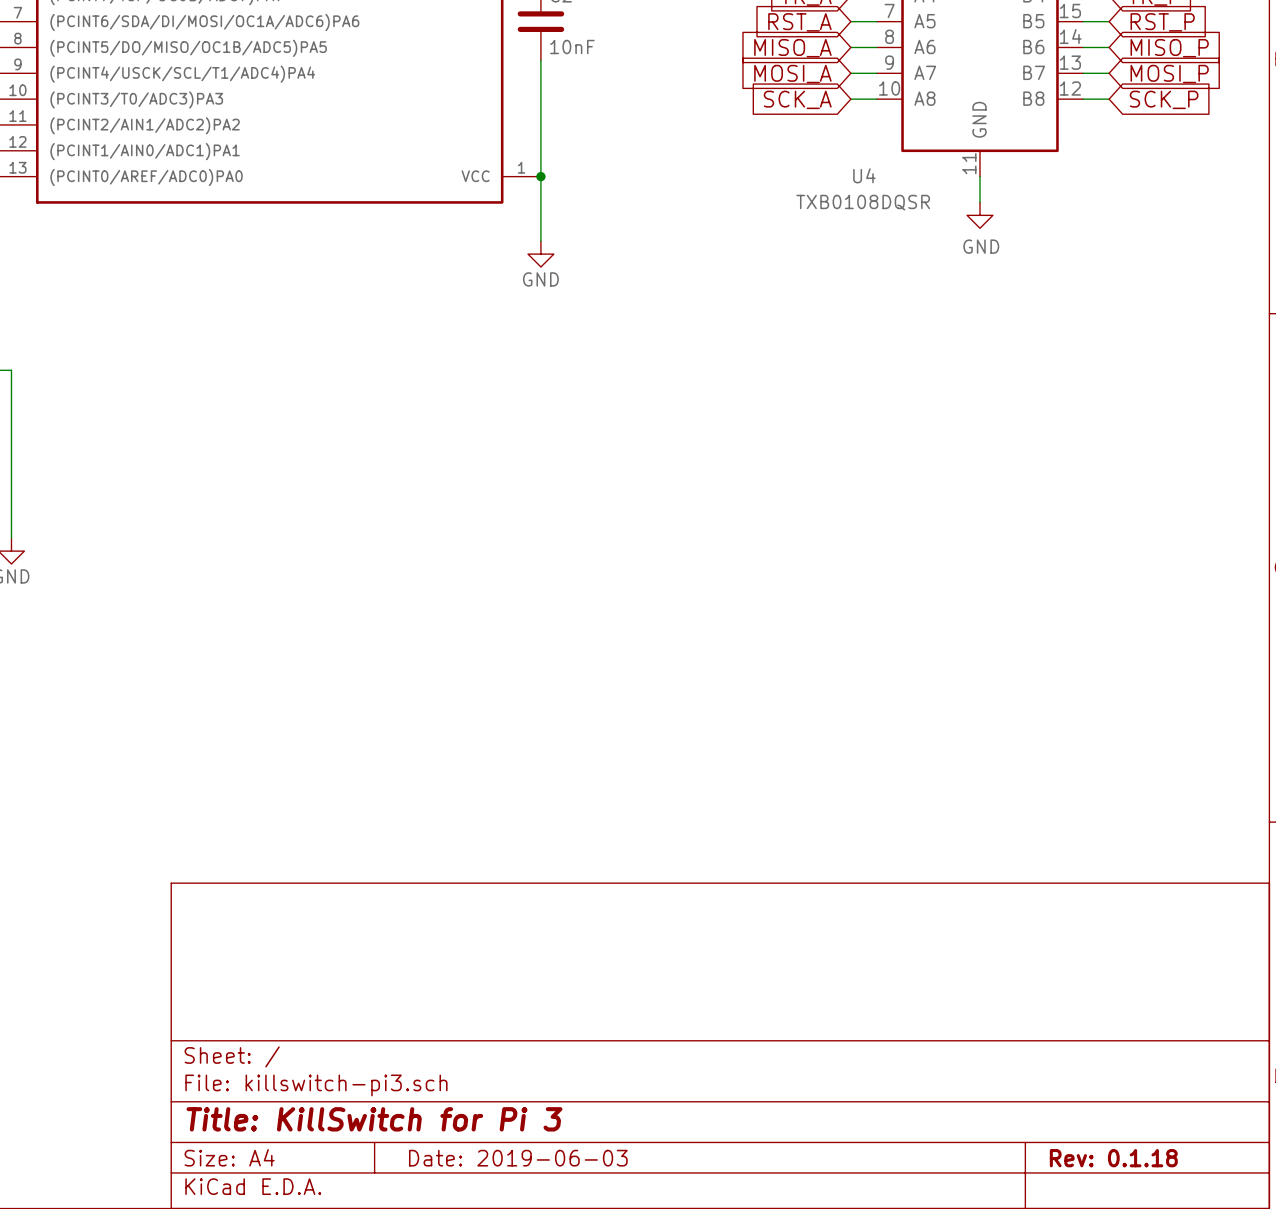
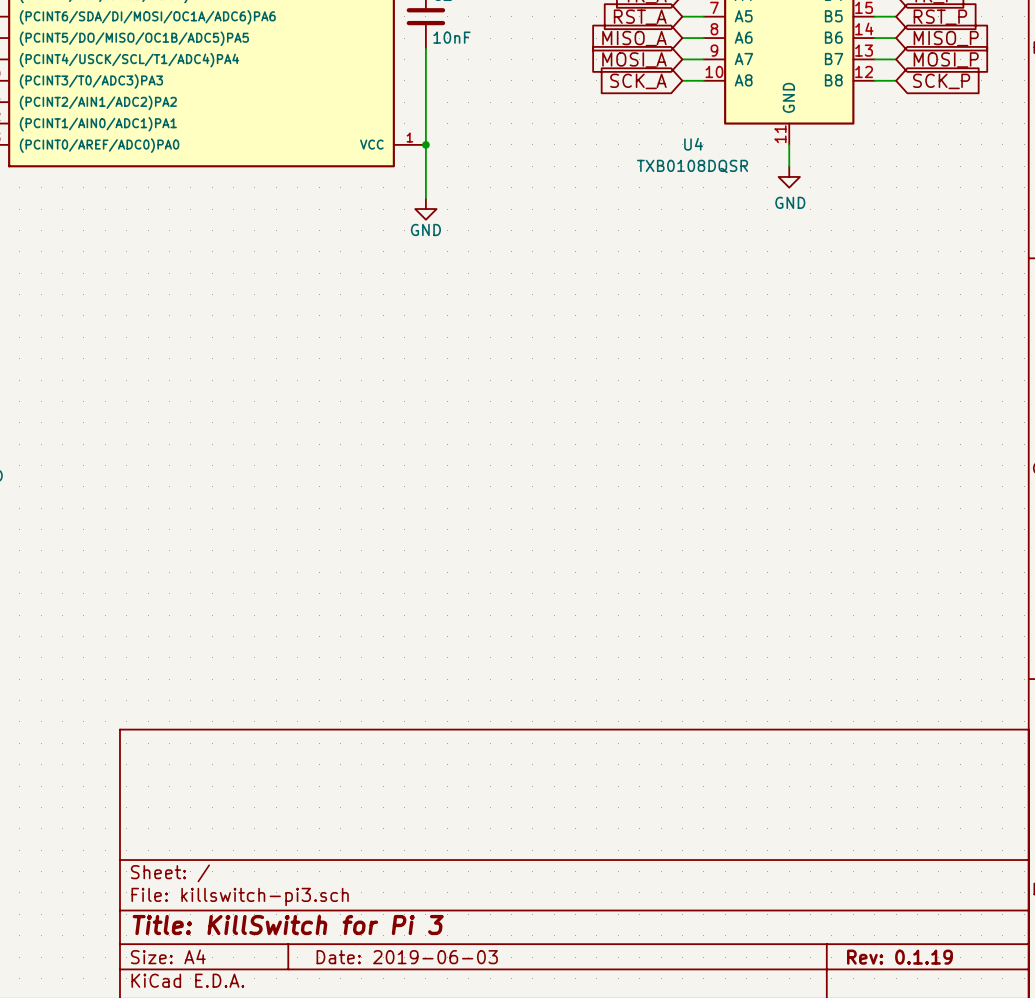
title block: Rev: 0.1.18 (1113, 1158) -> Rev: 0.1.19 (899, 957)

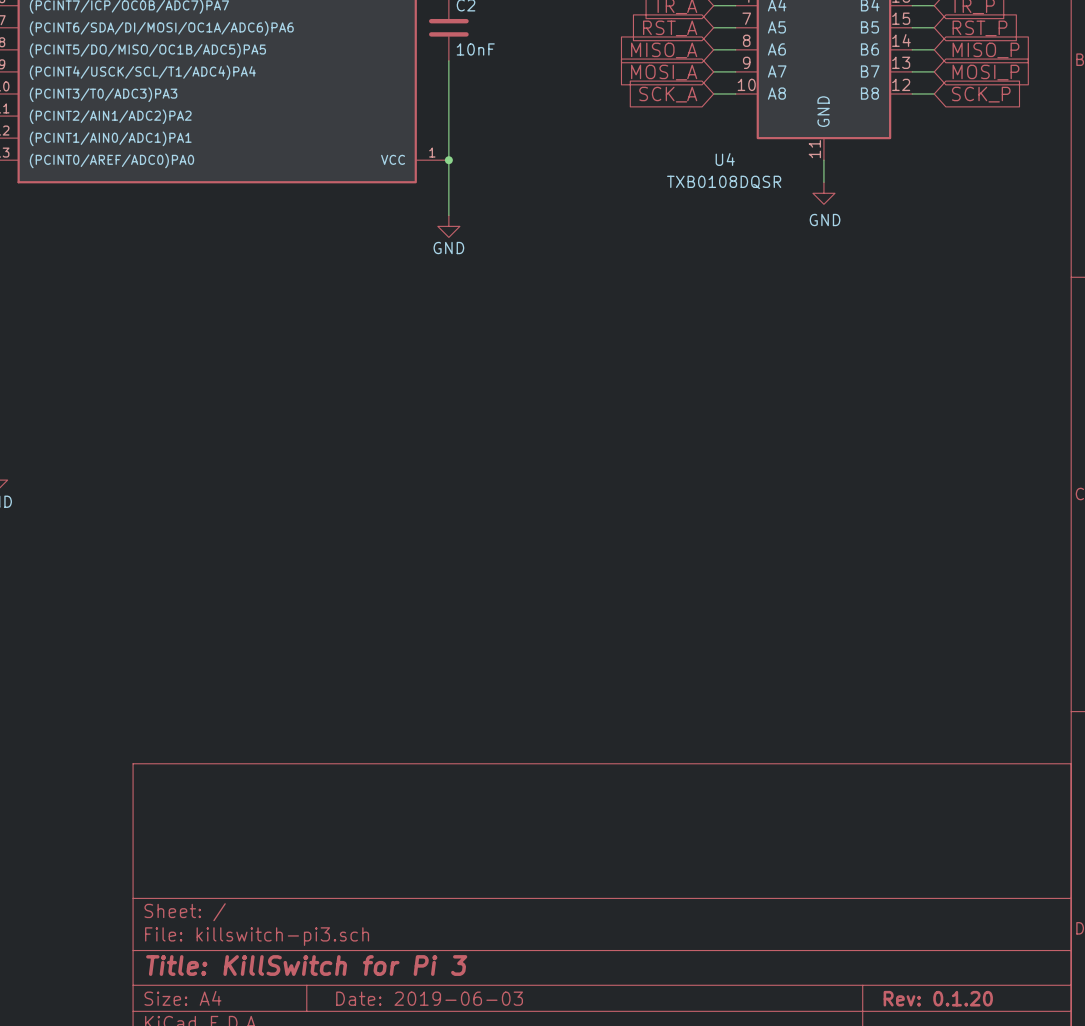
title block: Rev: 0.1.19 (899, 957) -> Rev: 0.1.20 (938, 998)

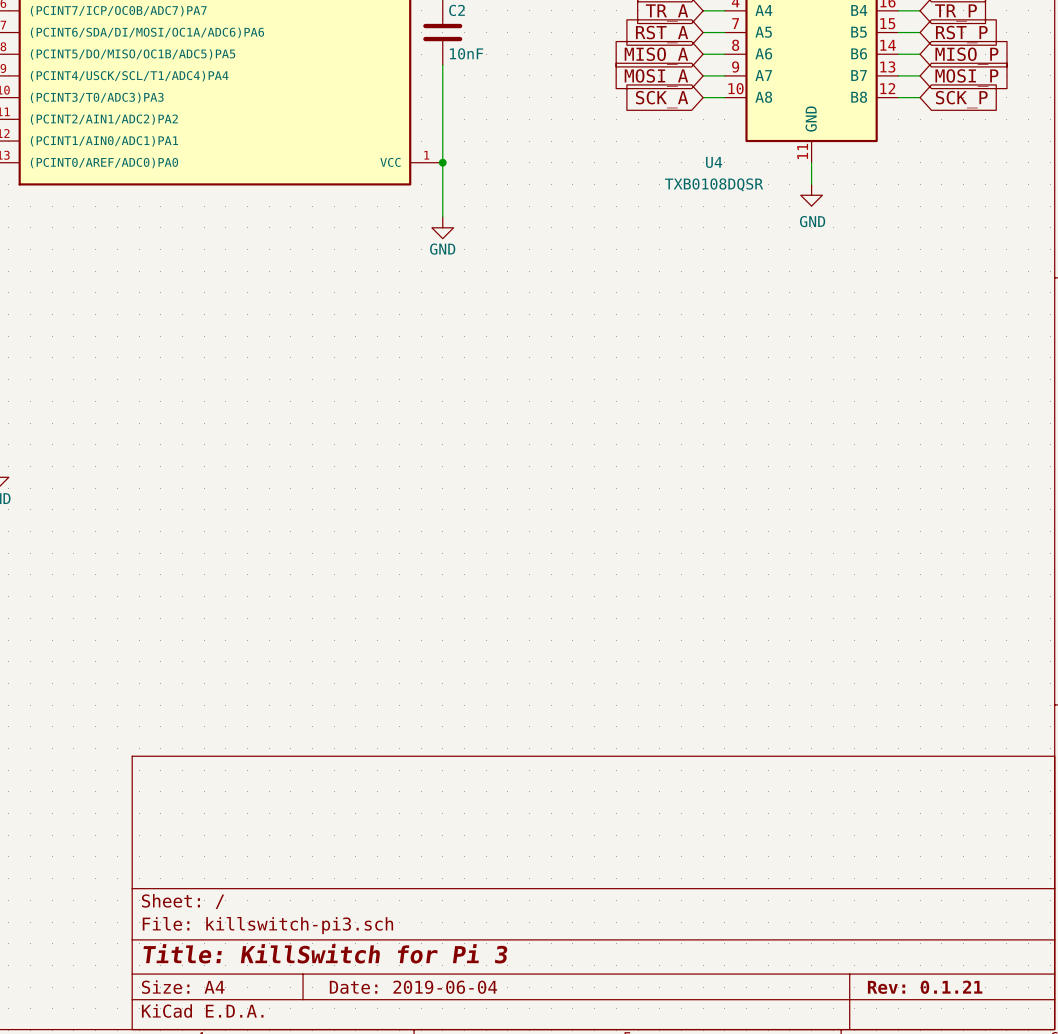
title block: Date: 2019-06-03 (429, 998) -> Date: 2019-06-04 (413, 987)
title block: Rev: 0.1.20 (938, 998) -> Rev: 0.1.21 (925, 987)

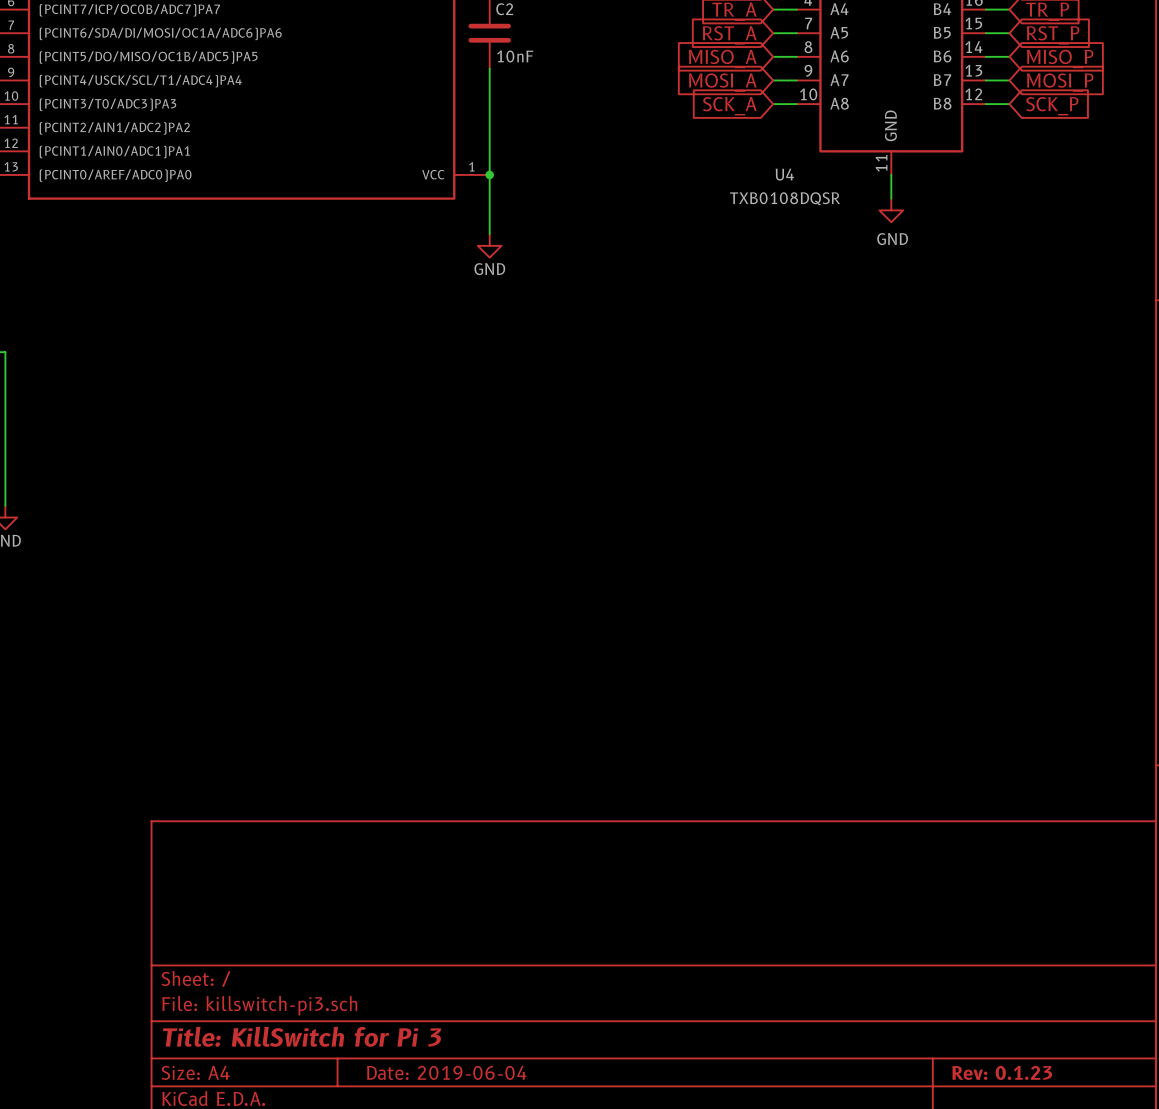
title block: Rev: 0.1.21 (925, 987) -> Rev: 0.1.23 (1002, 1072)

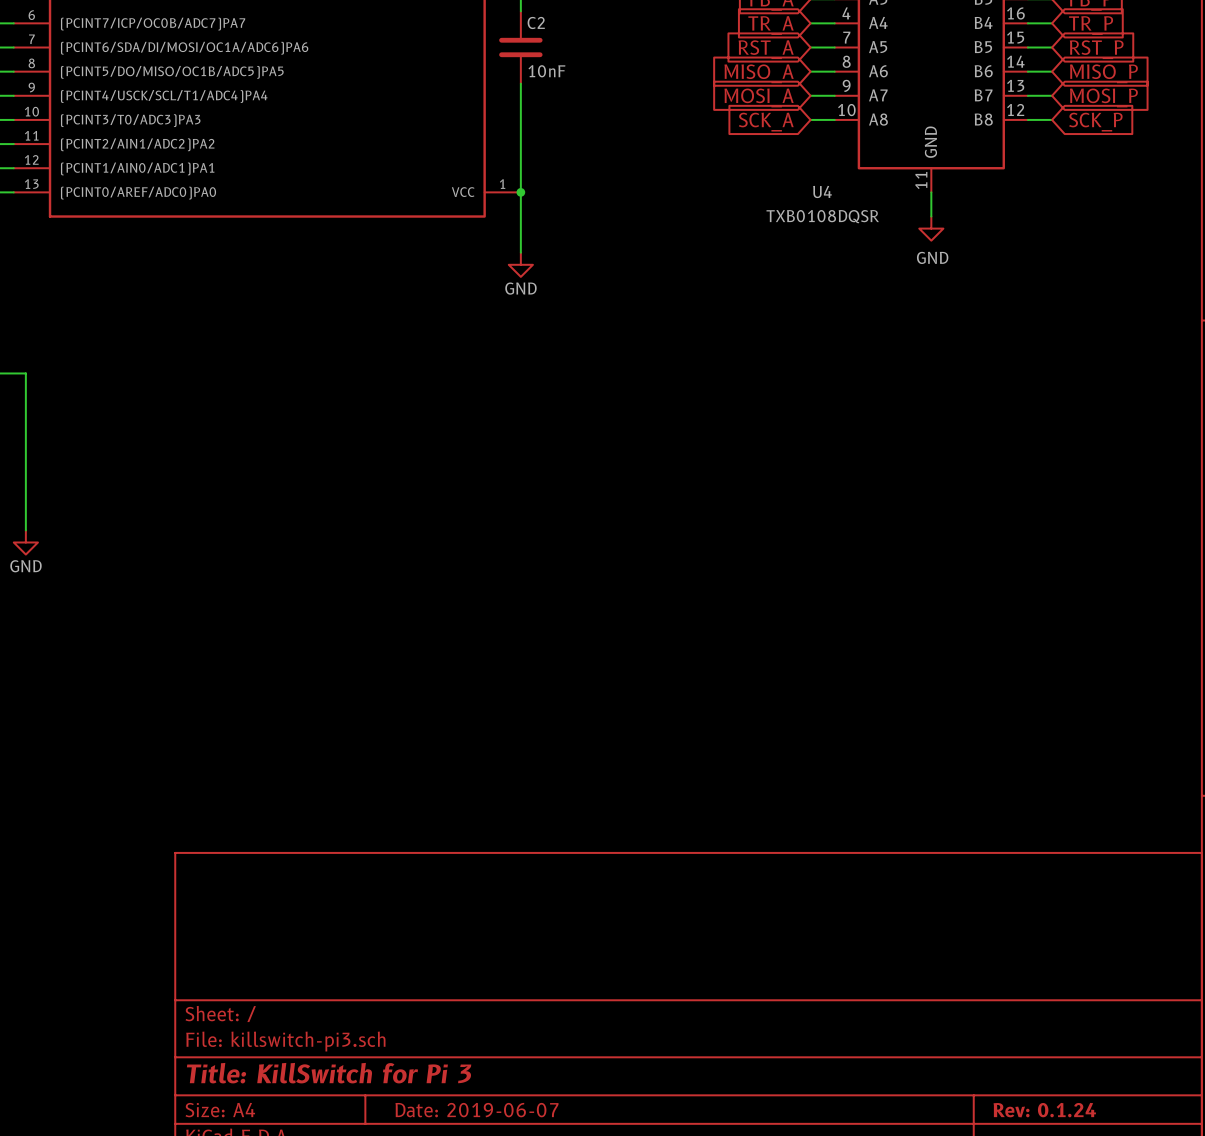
title block: Date: 2019-06-04 (446, 1072) -> Date: 2019-06-07 (476, 1110)
title block: Rev: 0.1.23 (1002, 1072) -> Rev: 0.1.24 (1044, 1110)

